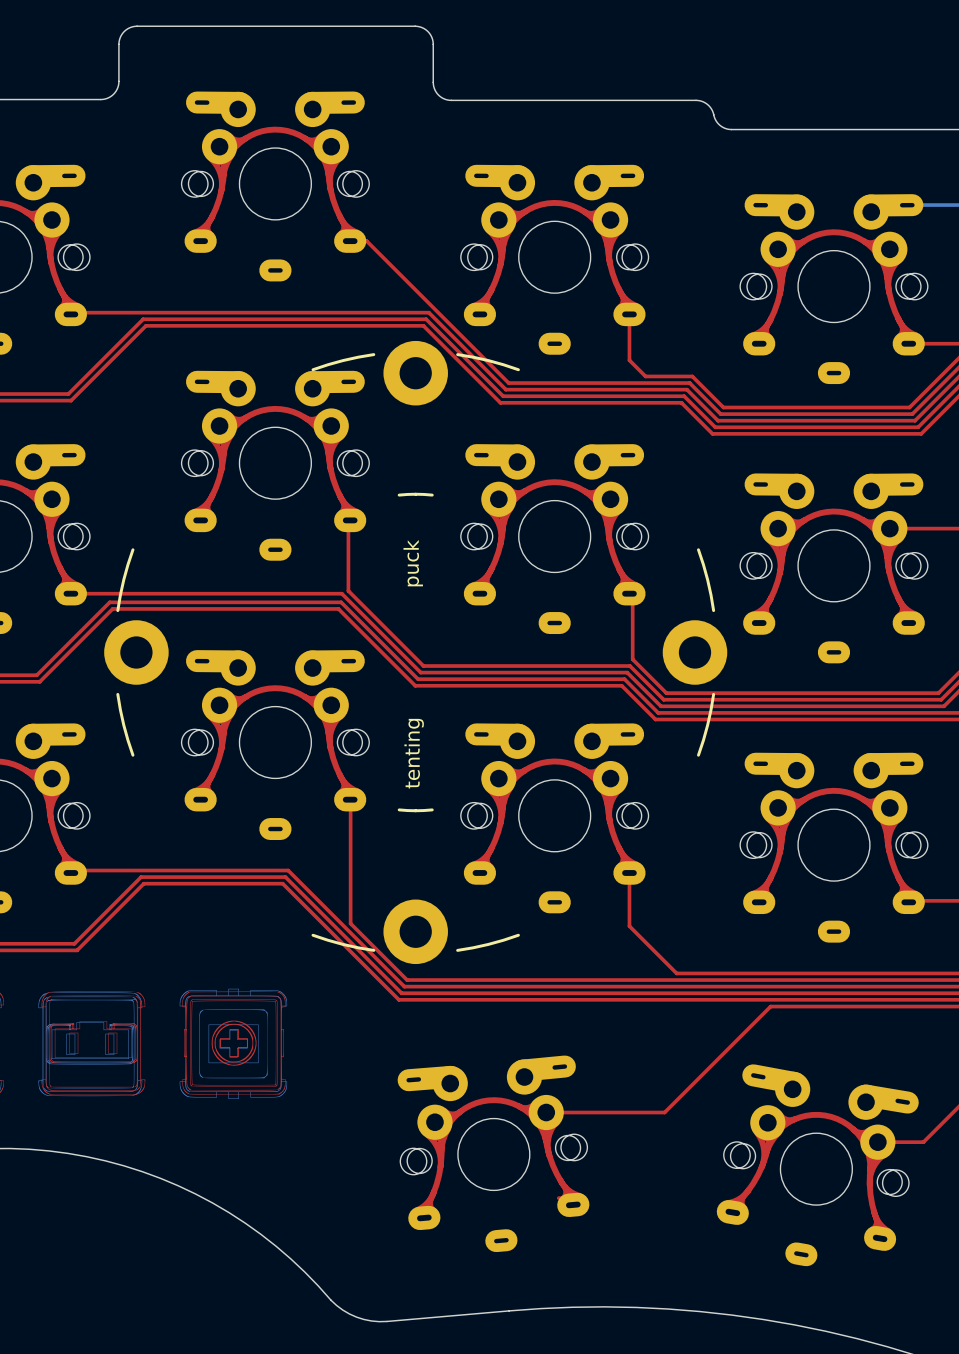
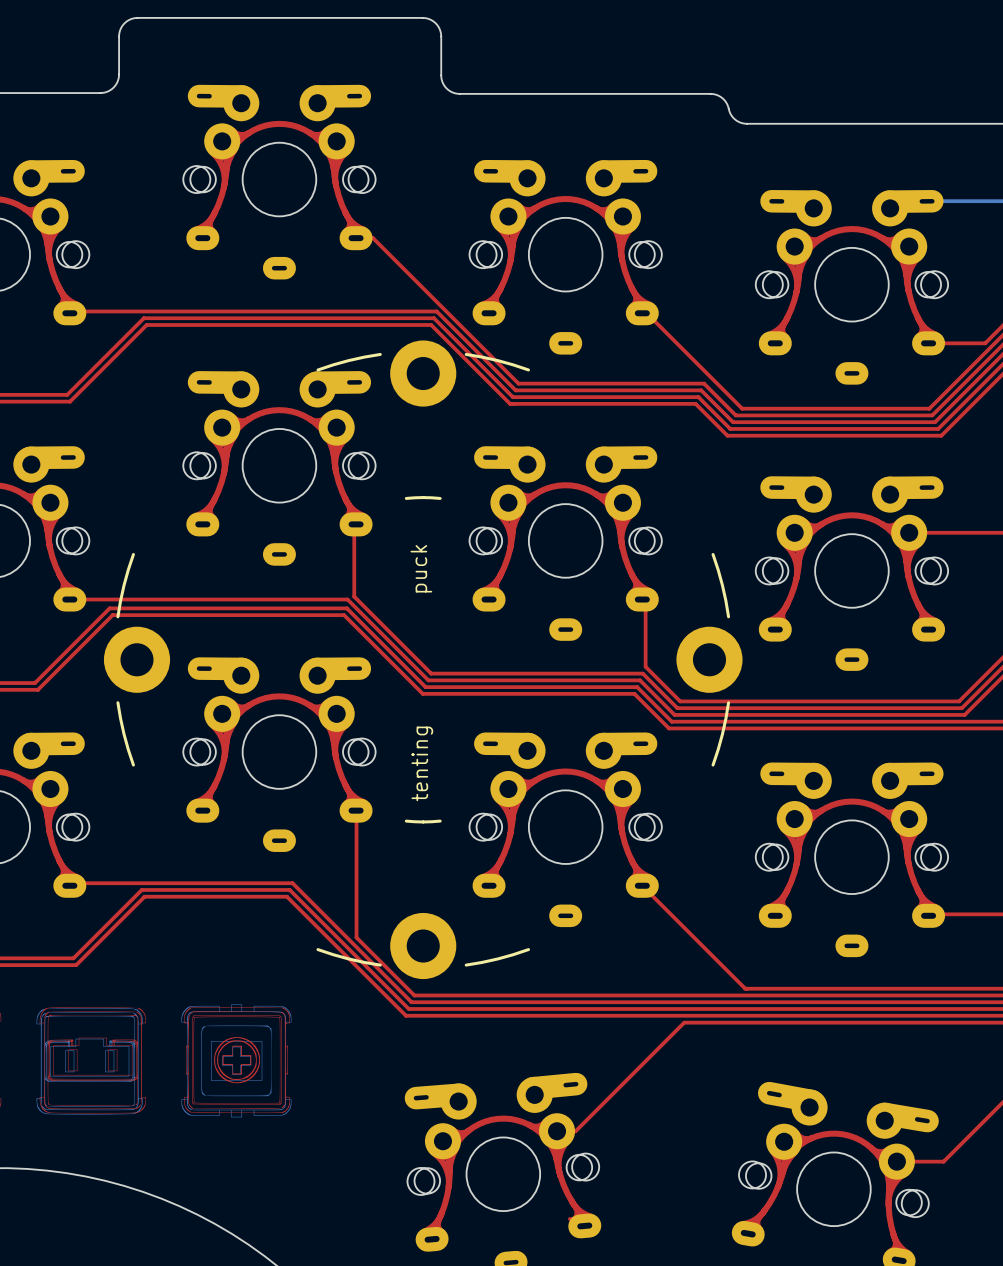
top track: (629, 314) (629, 360) (645, 376) (692, 376) (723, 407) (726, 407) -> (642, 313) (646, 313) (742, 408)
top track: (629, 880) (629, 926) (676, 973) (729, 973) -> (642, 885) (745, 988)
top track: (770, 1006) (664, 1112) (564, 1112) -> (787, 1022) (684, 1022) (575, 1131)

